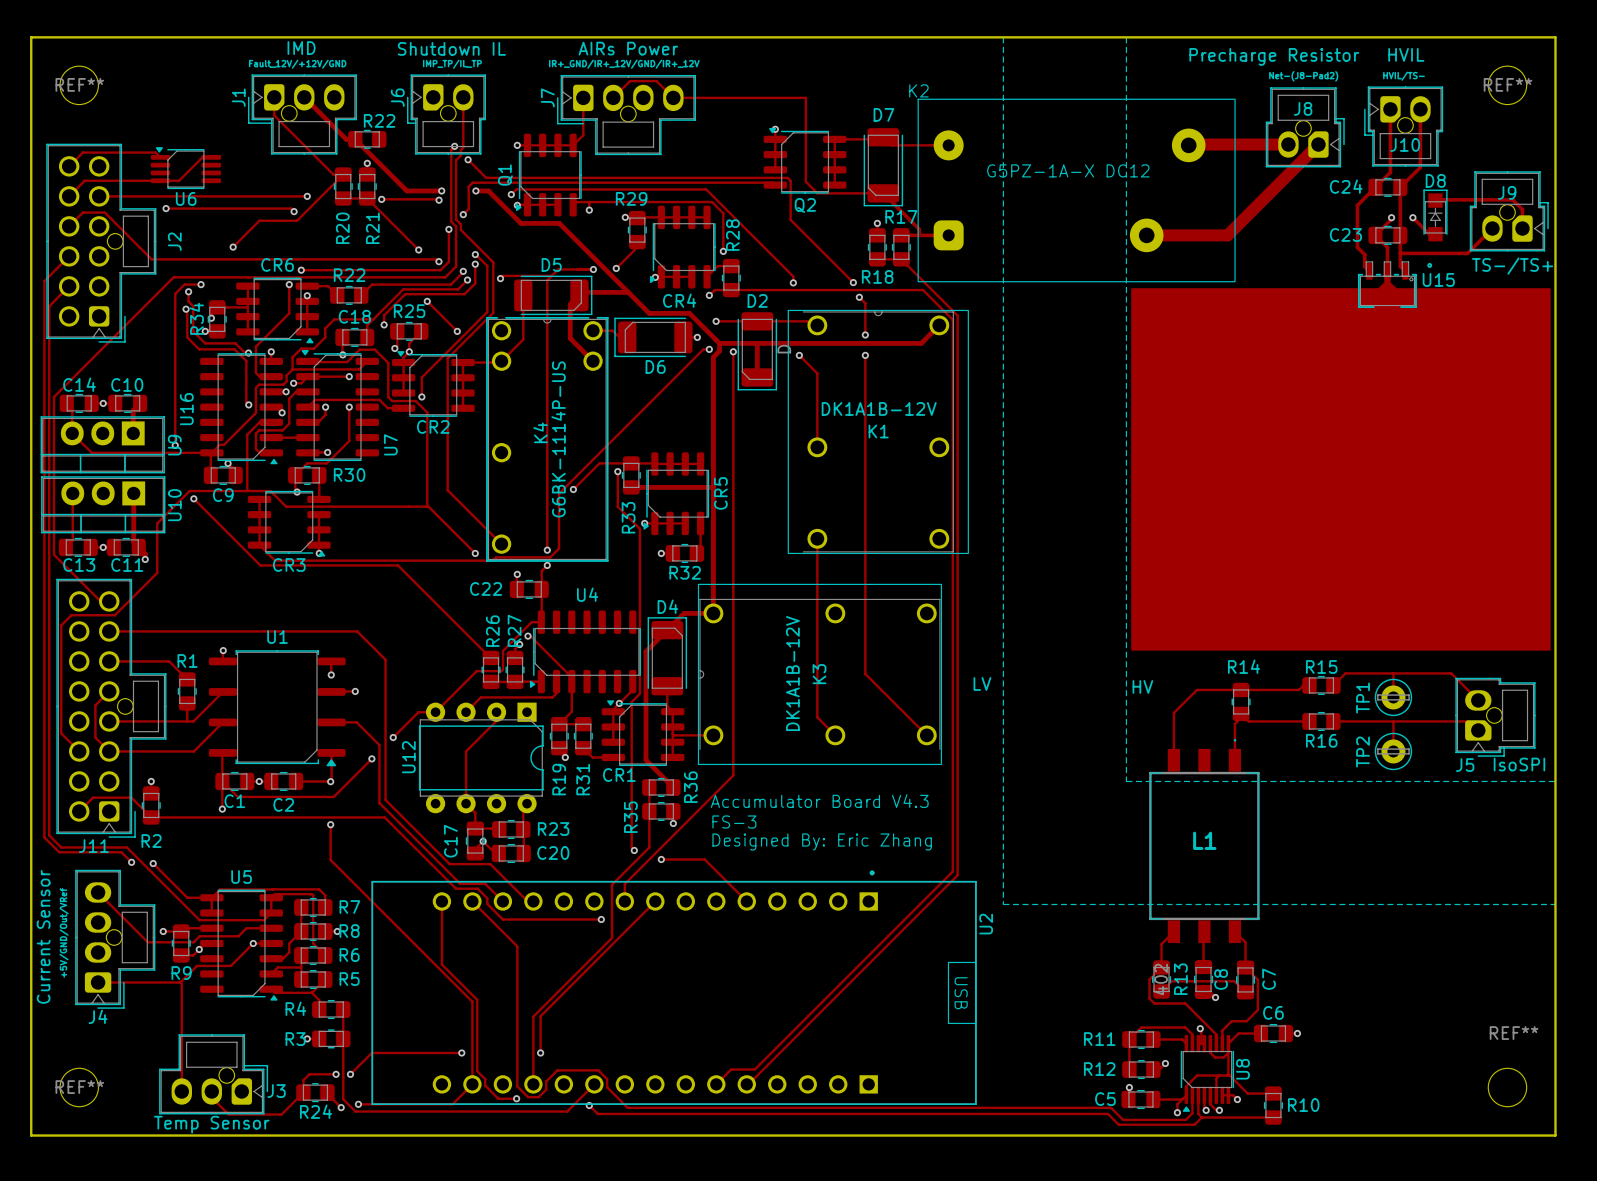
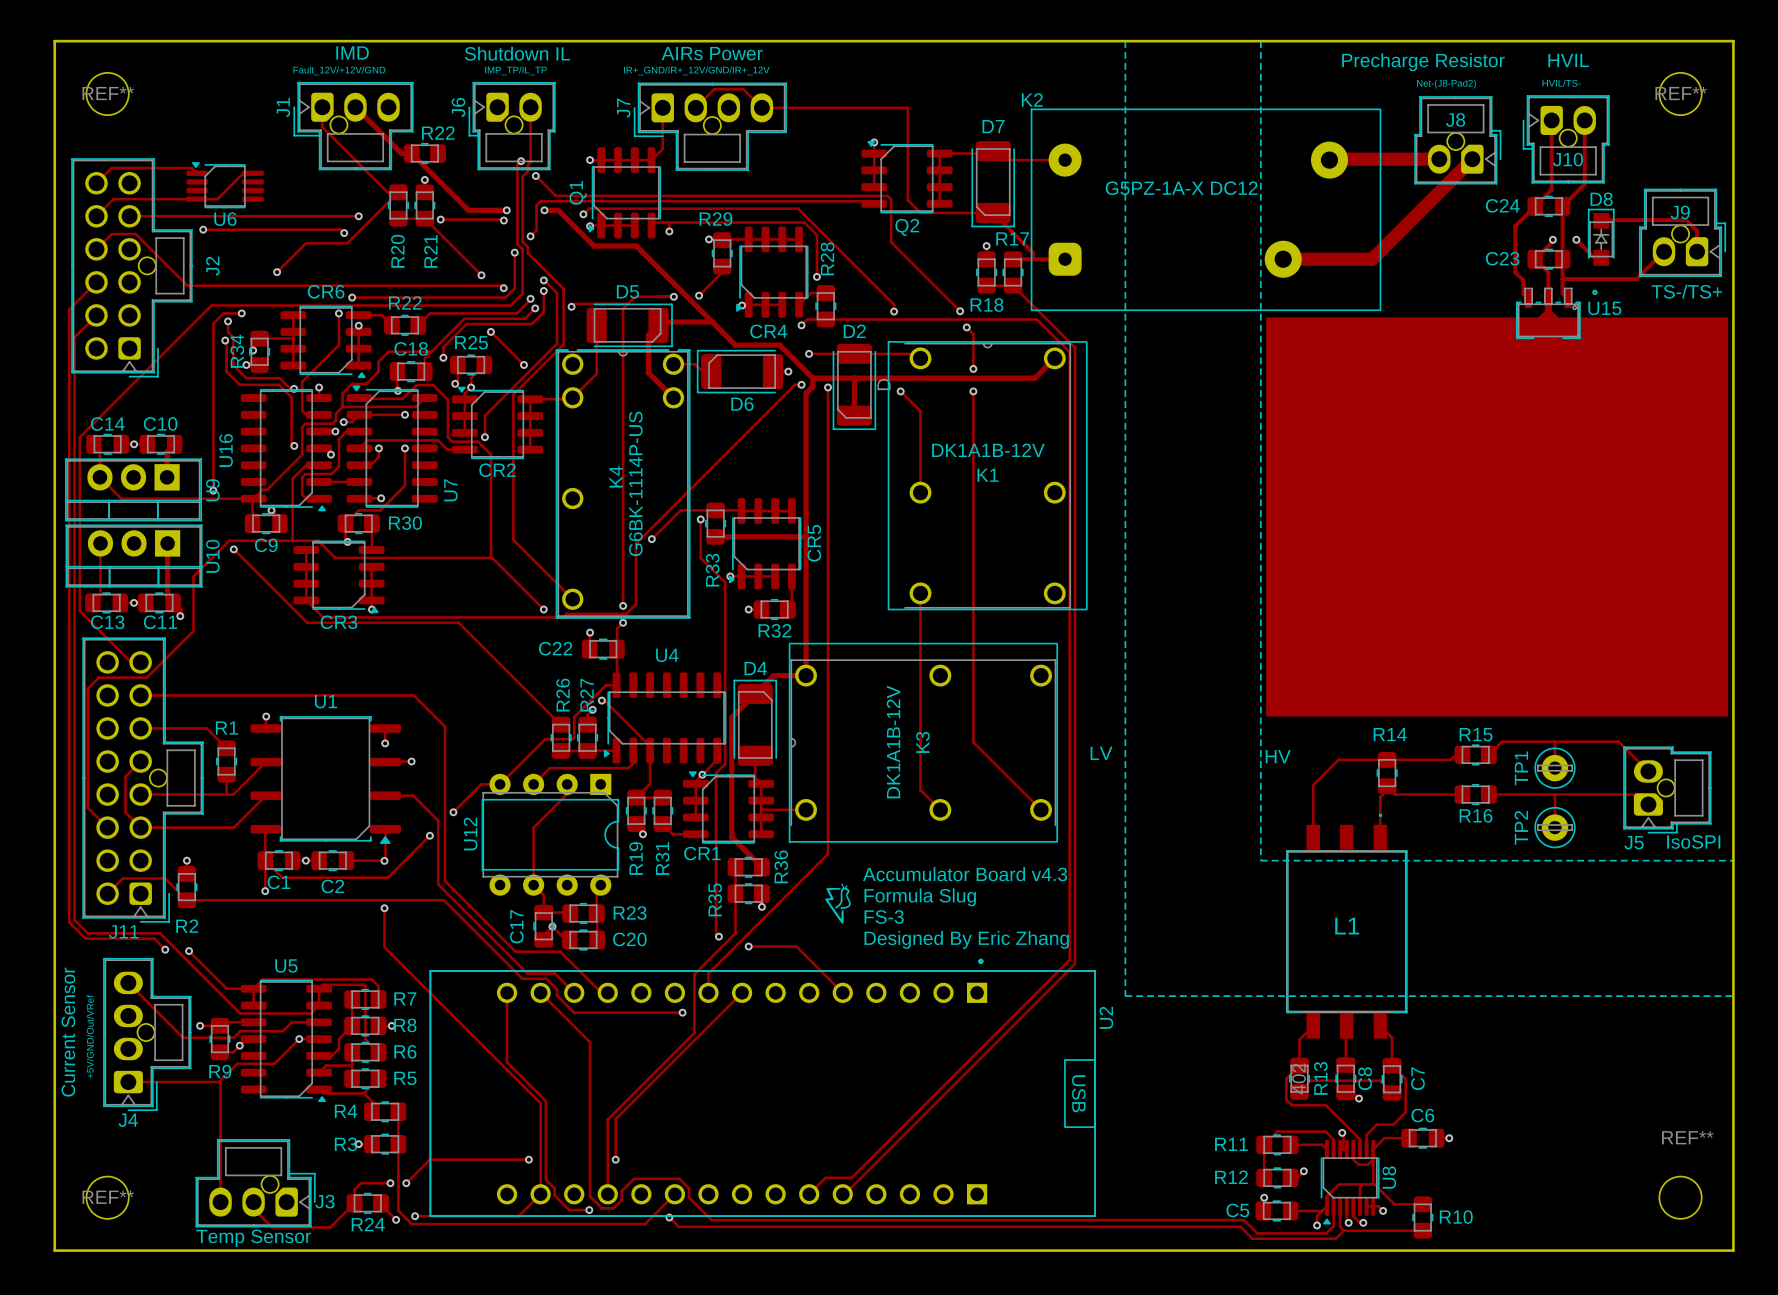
text: Accumulator Board V4.3 (819, 801) -> Accumulator Board v4.3 (965, 874)
drawing: none -> [825, 883, 851, 924]
text: none -> Formula Slug (920, 897)
text position: FS-3 (734, 822) -> FS-3 (884, 916)
text: Designed By: Eric Zhang (822, 842) -> Designed By Eric Zhang (966, 939)

